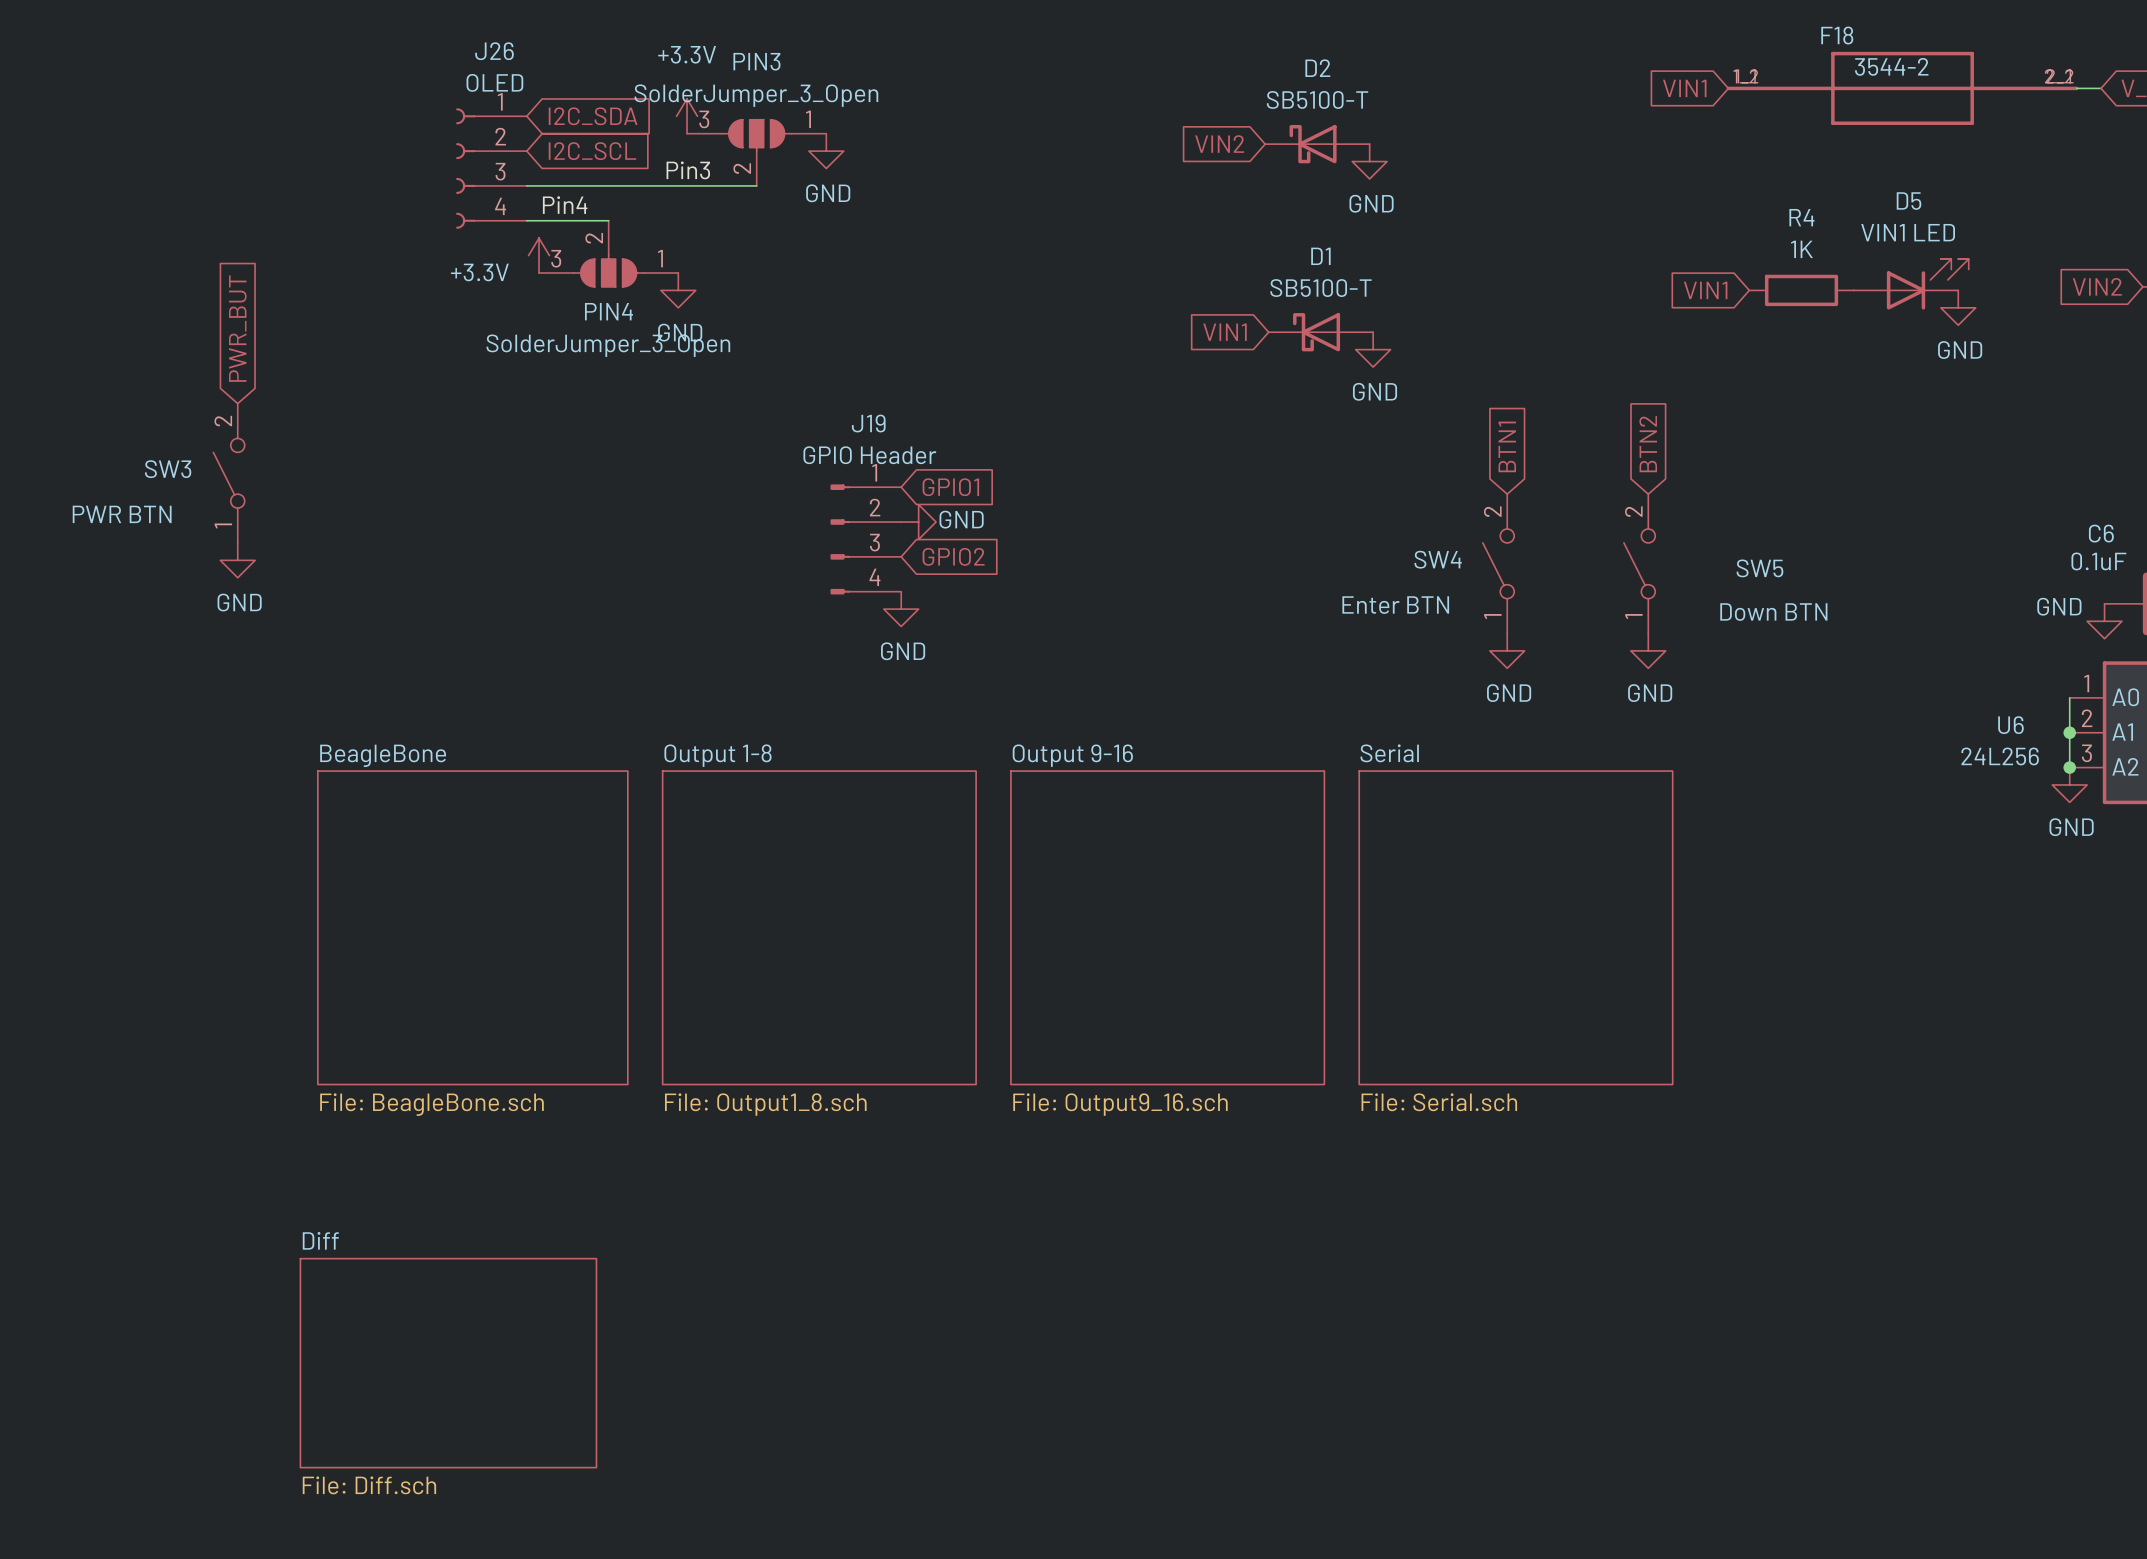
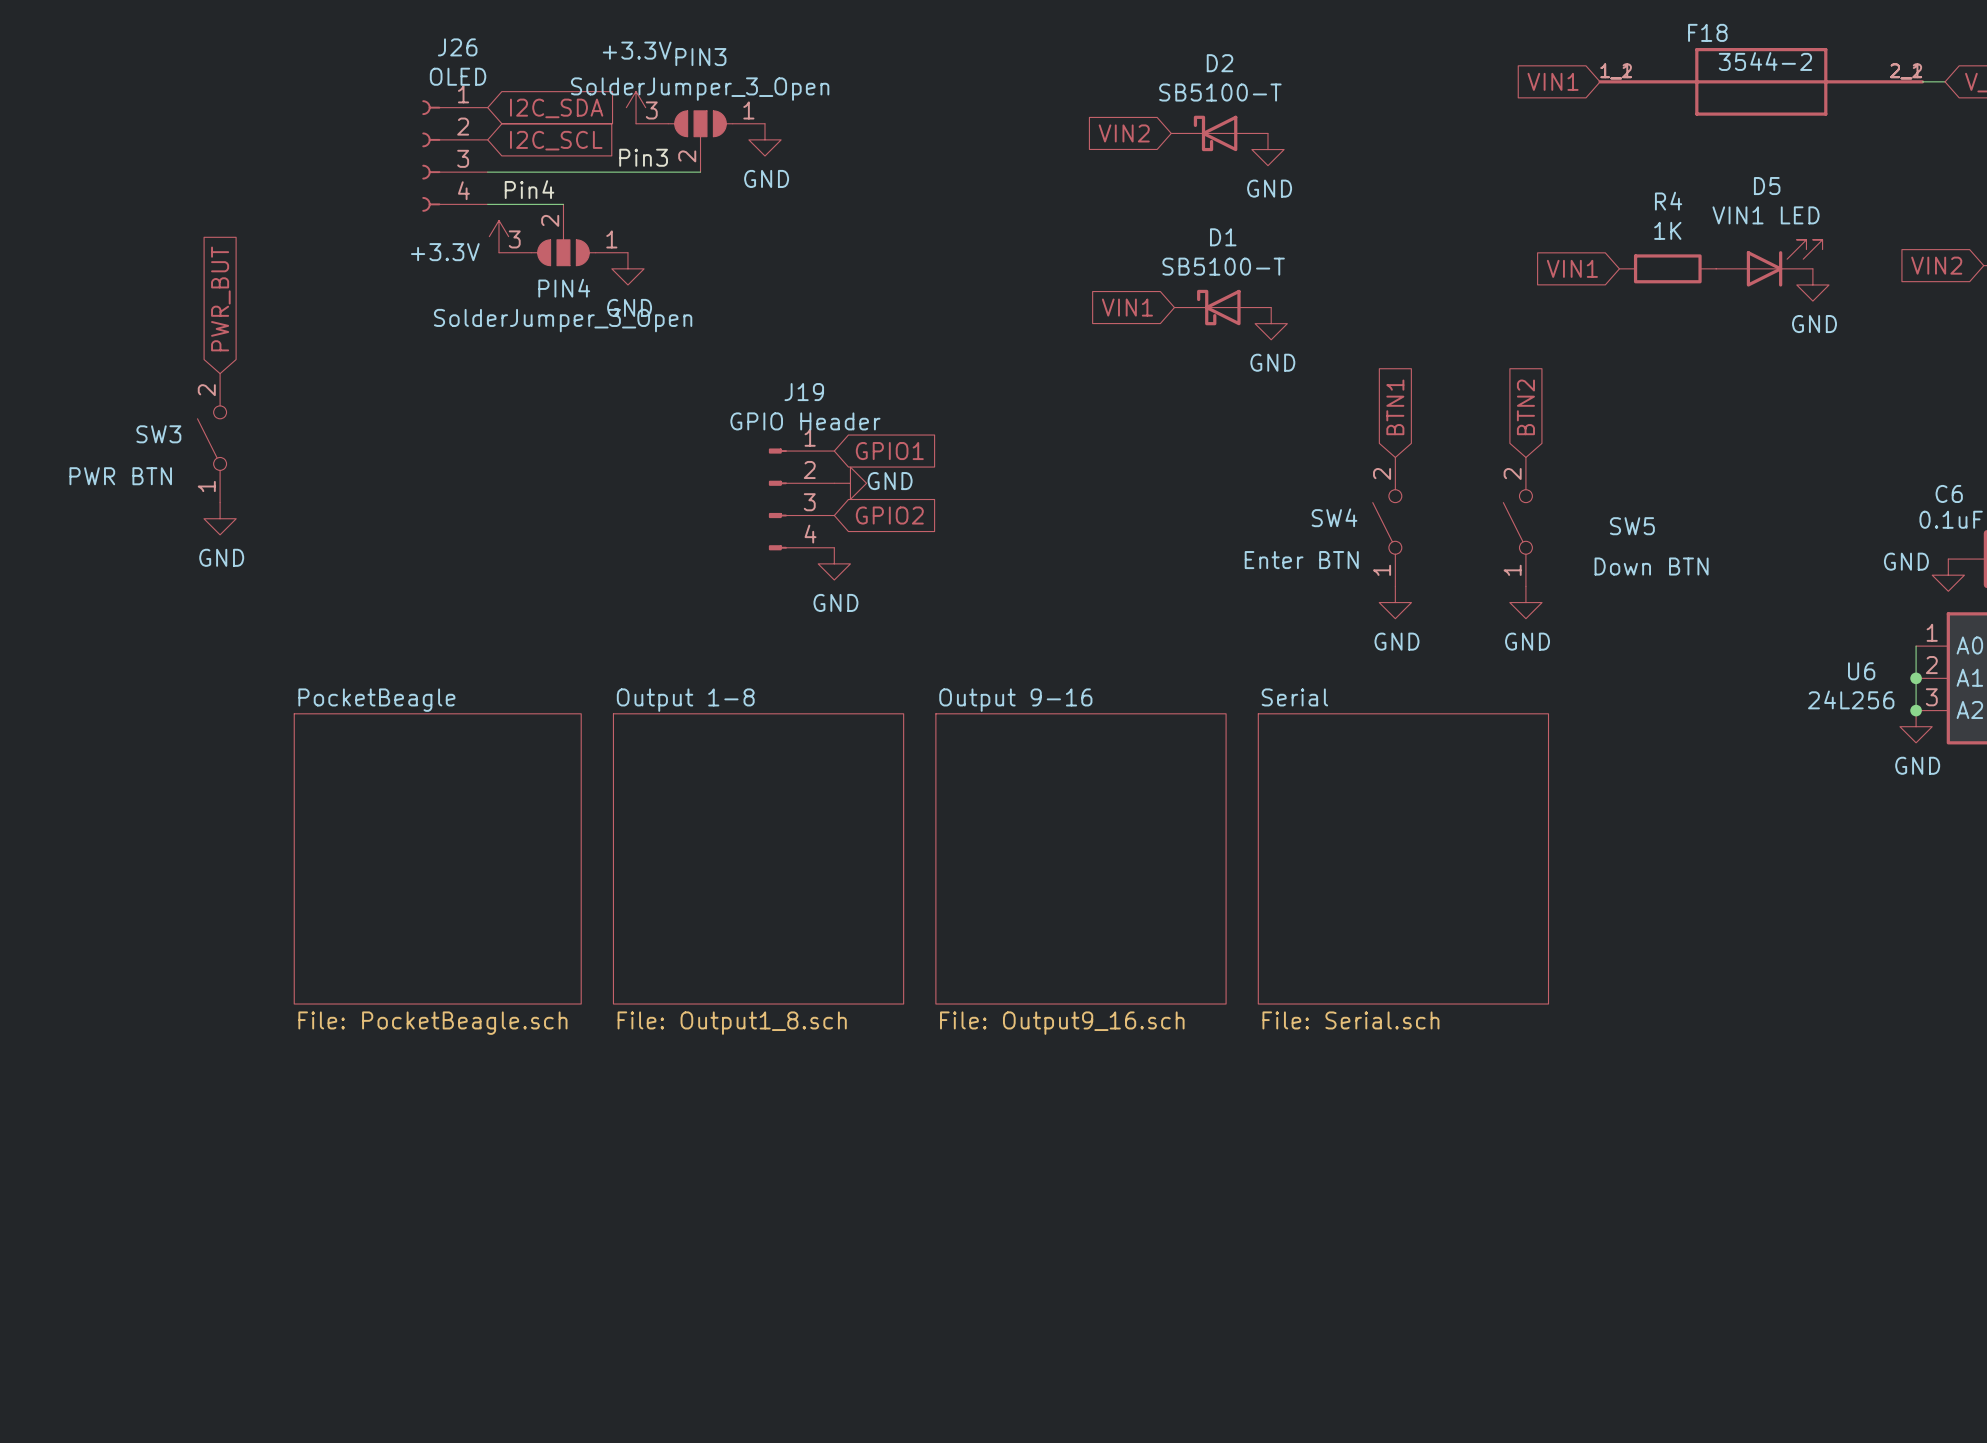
sheet BeagleBone name: BeagleBone (383, 755) -> PocketBeagle (376, 700)
sheet BeagleBone value: File: BeagleBone.sch (431, 1104) -> File: PocketBeagle.sch (432, 1023)
sheet Diff: File: Diff.sch (448, 1363) -> none

